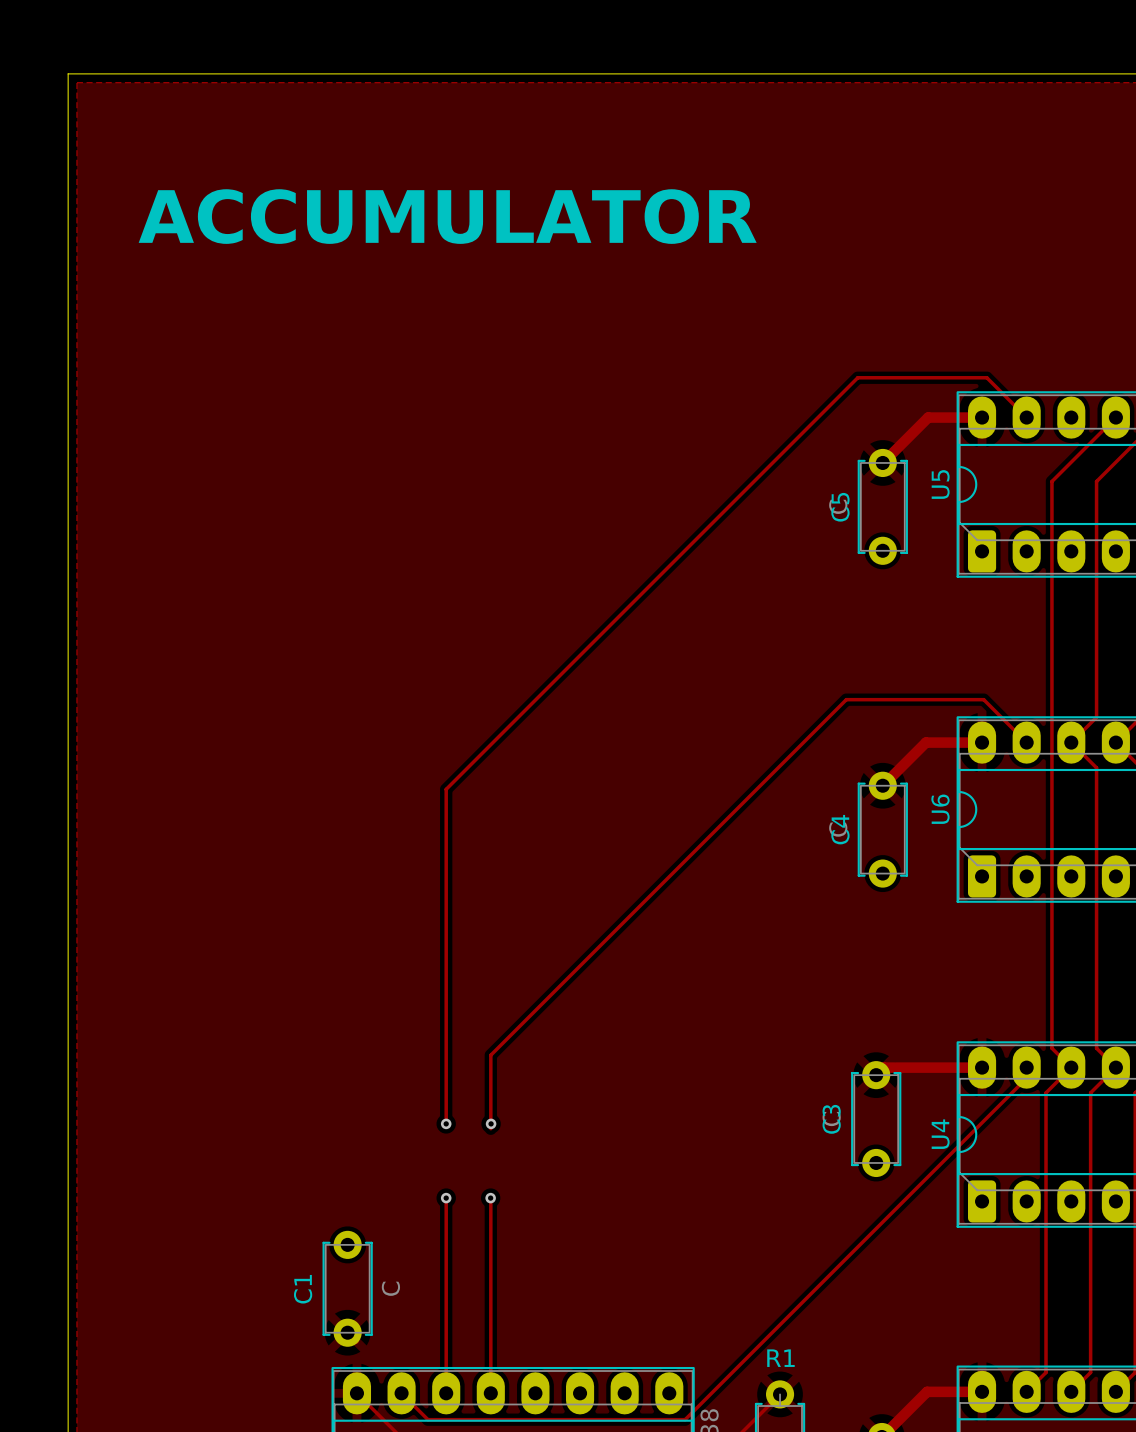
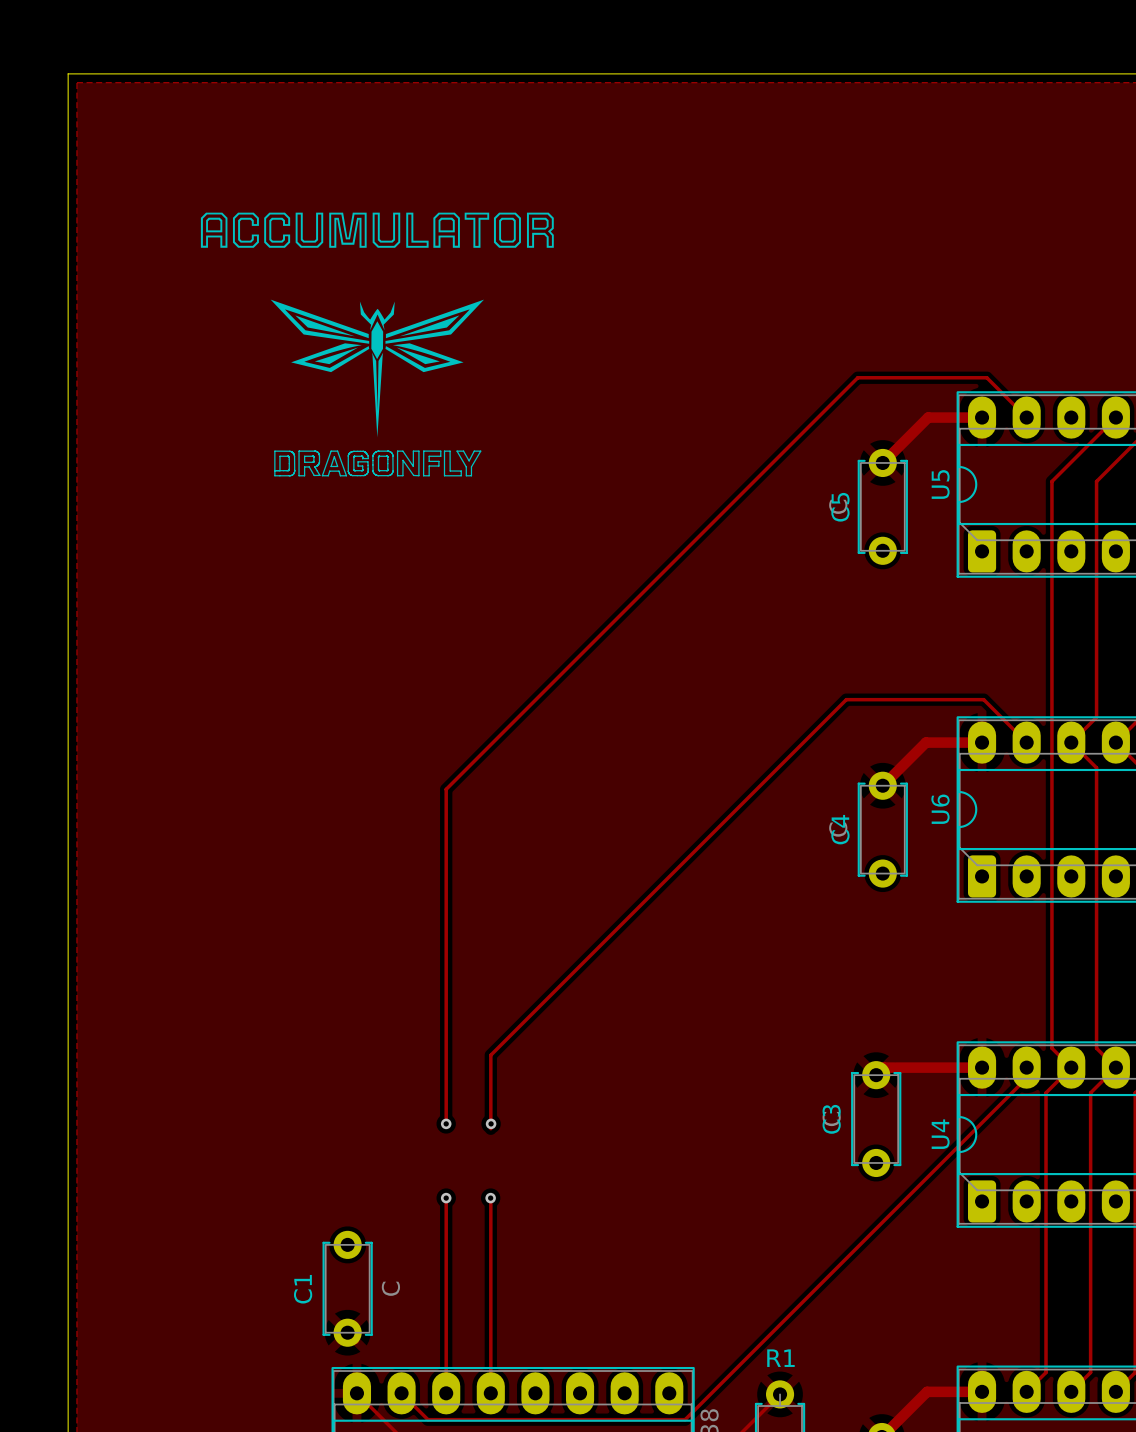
drawing: none -> [200, 212, 554, 248]
text: ACCUMULATOR (447, 216) -> none
drawing: none -> [270, 299, 485, 438]
line: none -> (291, 451) (274, 451) (274, 475) (292, 474)
line: none -> (314, 451) (299, 451) (299, 475) (304, 475) (304, 466) (309, 466) (314, 475) (319, 475) (315, 466)
line: none -> (331, 451) (337, 451) (346, 475) (340, 475) (339, 471) (329, 471) (328, 475) (322, 475) (331, 451)
line: none -> (353, 451) (351, 452)
line: none -> (354, 451) (363, 451)
line: none -> (387, 451) (375, 452)
line: none -> (397, 451) (397, 475) (402, 475) (403, 460) (413, 475) (418, 475) (418, 451) (413, 451) (413, 466) (402, 451) (397, 451)
line: none -> (423, 451) (423, 475) (429, 475) (429, 466) (438, 466) (438, 461) (429, 461) (429, 456) (440, 456) (440, 451) (423, 451)
line: none -> (444, 451) (450, 451) (450, 470) (461, 471) (461, 475) (444, 475) (444, 451)
line: none -> (457, 451) (463, 451) (469, 460) (474, 451) (480, 451) (471, 466) (471, 475) (466, 475) (466, 467) (457, 451)
line: none -> (366, 453) (367, 455)
line: none -> (294, 454) (294, 470)
line: none -> (319, 454) (319, 462)
line: none -> (348, 454) (348, 471)
line: none -> (392, 454) (393, 471)
line: none -> (368, 455) (368, 458) (362, 457)
line: none -> (287, 456) (279, 456) (279, 470)
line: none -> (312, 456) (304, 456) (304, 462) (312, 462)
line: none -> (334, 456) (331, 466) (337, 466) (334, 456)
line: none -> (354, 456) (361, 456)
line: none -> (372, 456) (373, 472)
line: none -> (379, 456) (386, 456)
line: none -> (289, 457) (289, 469)
line: none -> (313, 457) (313, 461)
line: none -> (353, 457) (353, 469)
line: none -> (378, 457) (378, 469)
line: none -> (387, 457) (387, 469)
line: none -> (319, 463) (318, 463)
line: none -> (362, 469) (362, 466) (358, 466) (358, 461) (367, 461) (368, 471)
line: none -> (279, 470) (287, 470)
line: none -> (355, 470) (361, 470)
line: none -> (379, 470) (386, 470)
line: none -> (294, 471) (294, 472)
line: none -> (392, 471) (392, 472)
line: none -> (348, 472) (348, 472)
line: none -> (365, 474) (364, 475)
line: none -> (351, 475) (363, 475)
line: none -> (376, 475) (377, 475)
line: none -> (389, 475) (378, 475)

